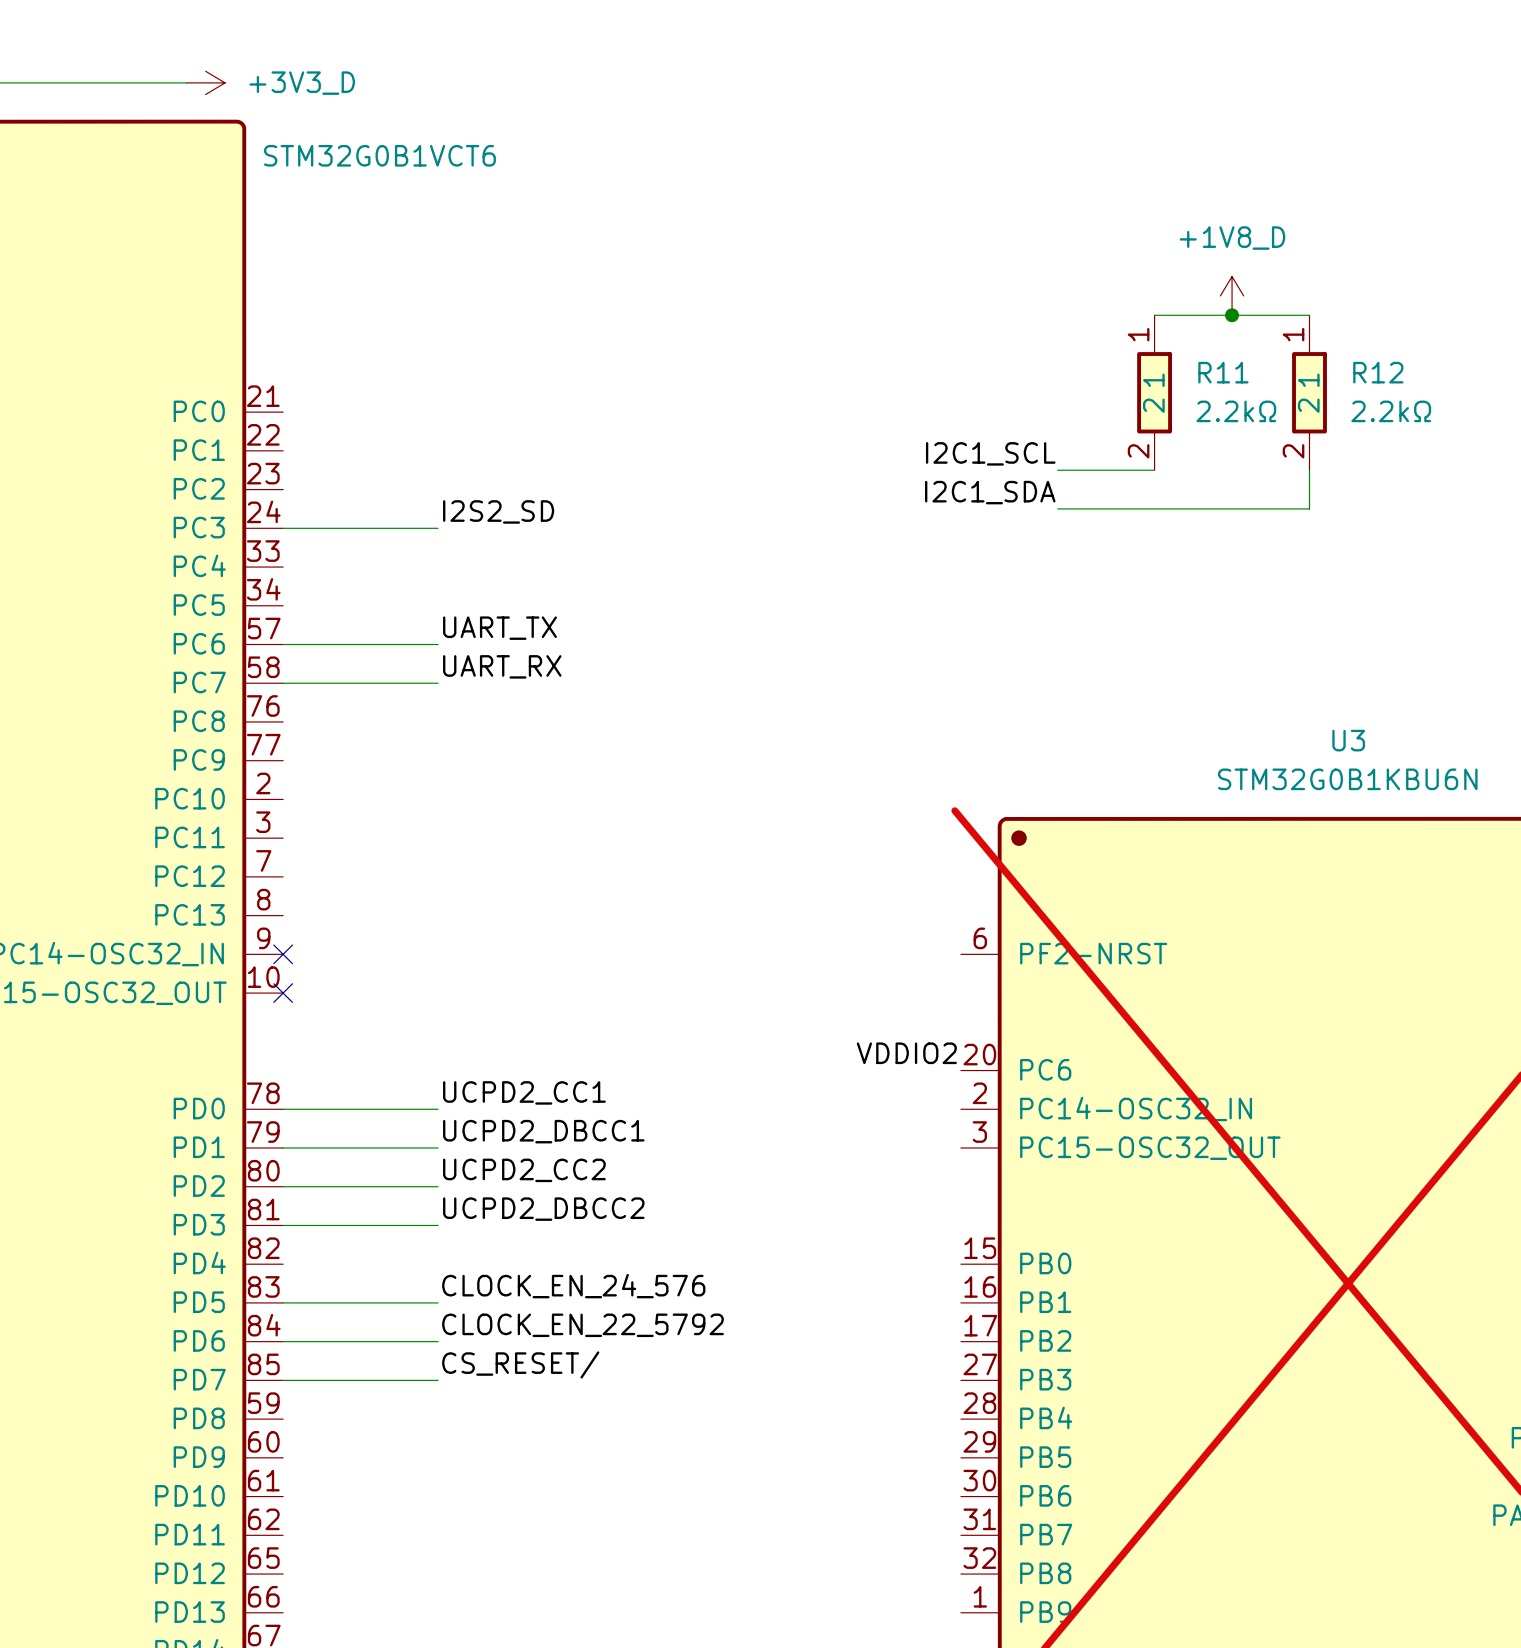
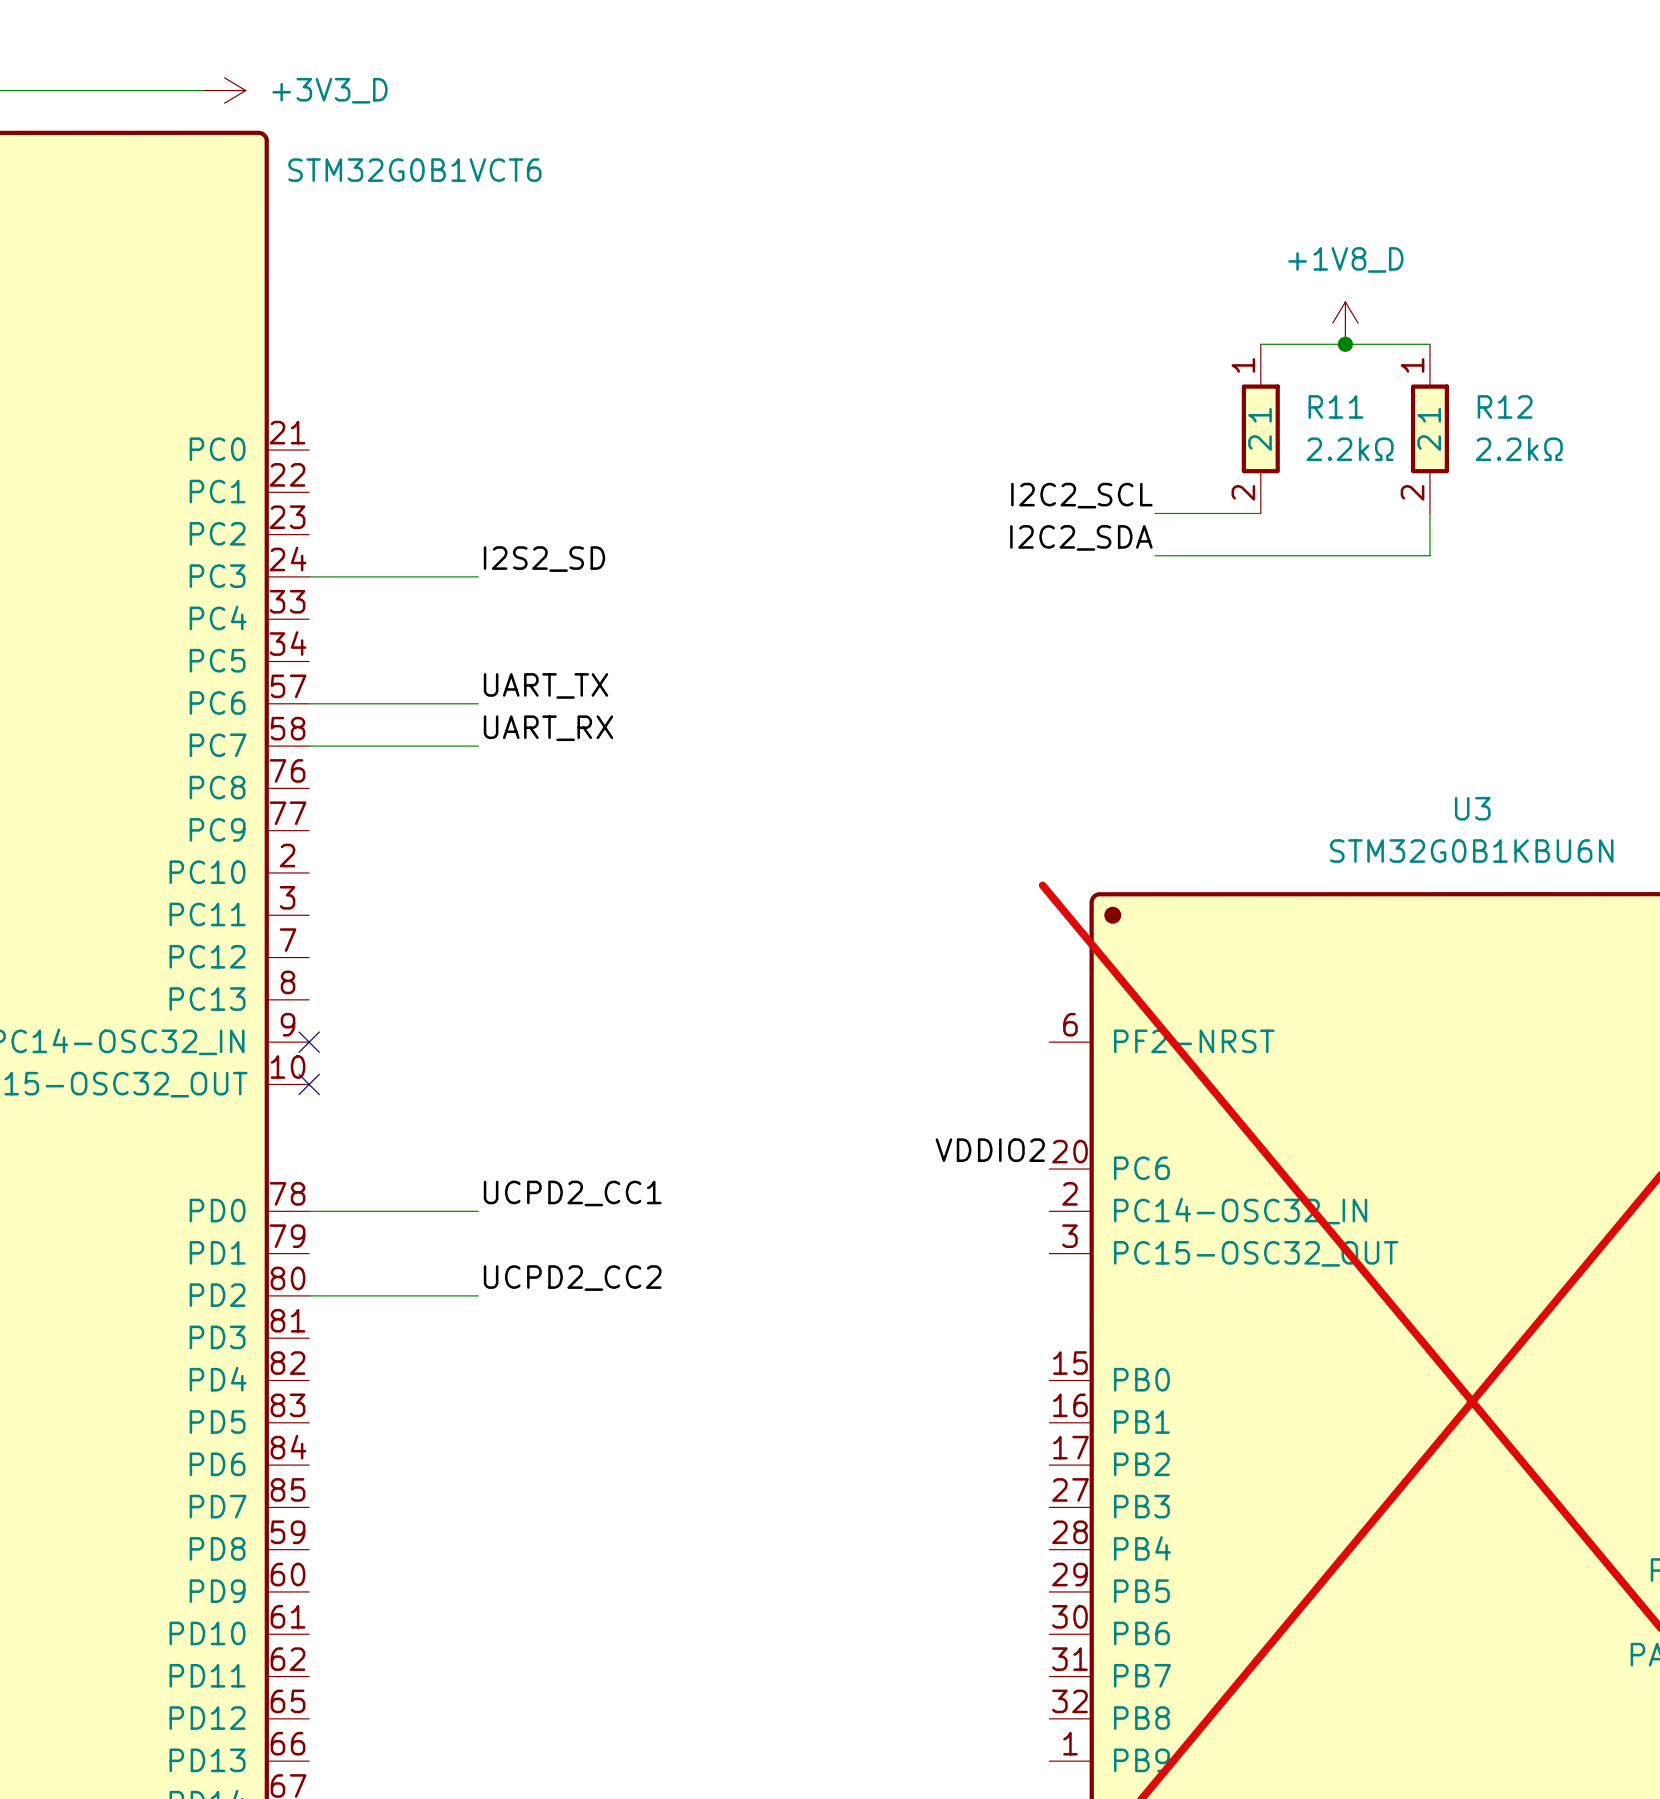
label: I2C1_SCL (990, 453) -> I2C2_SCL (1081, 495)
label: I2C1_SDA (990, 492) -> I2C2_SDA (1081, 537)
label: UCPD2_DBCC1 (543, 1131) -> none
wire: (283, 1148) (438, 1148) -> none
label: UCPD2_DBCC2 (543, 1209) -> none
wire: (283, 1225) (438, 1225) -> none
label: CLOCK_EN_24_576 (573, 1286) -> none
wire: (283, 1302) (438, 1302) -> none
label: CLOCK_EN_22_5792 (582, 1325) -> none
wire: (283, 1341) (438, 1341) -> none
label: CS_RESET/ (520, 1364) -> none
wire: (283, 1380) (438, 1380) -> none

